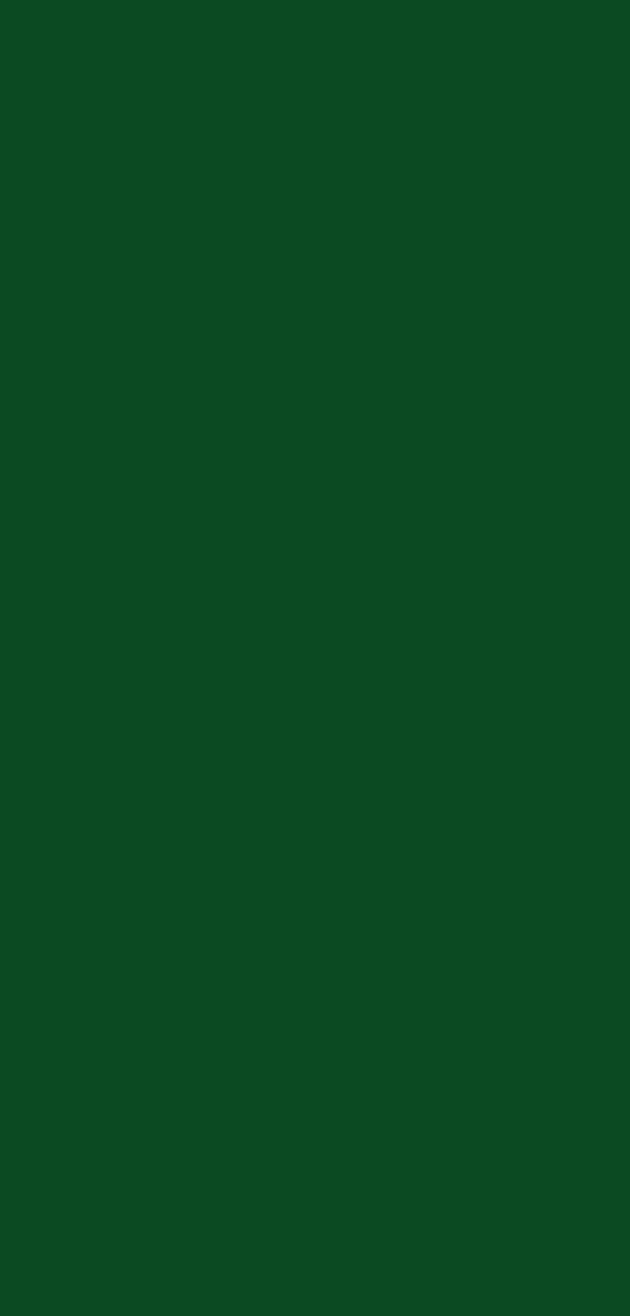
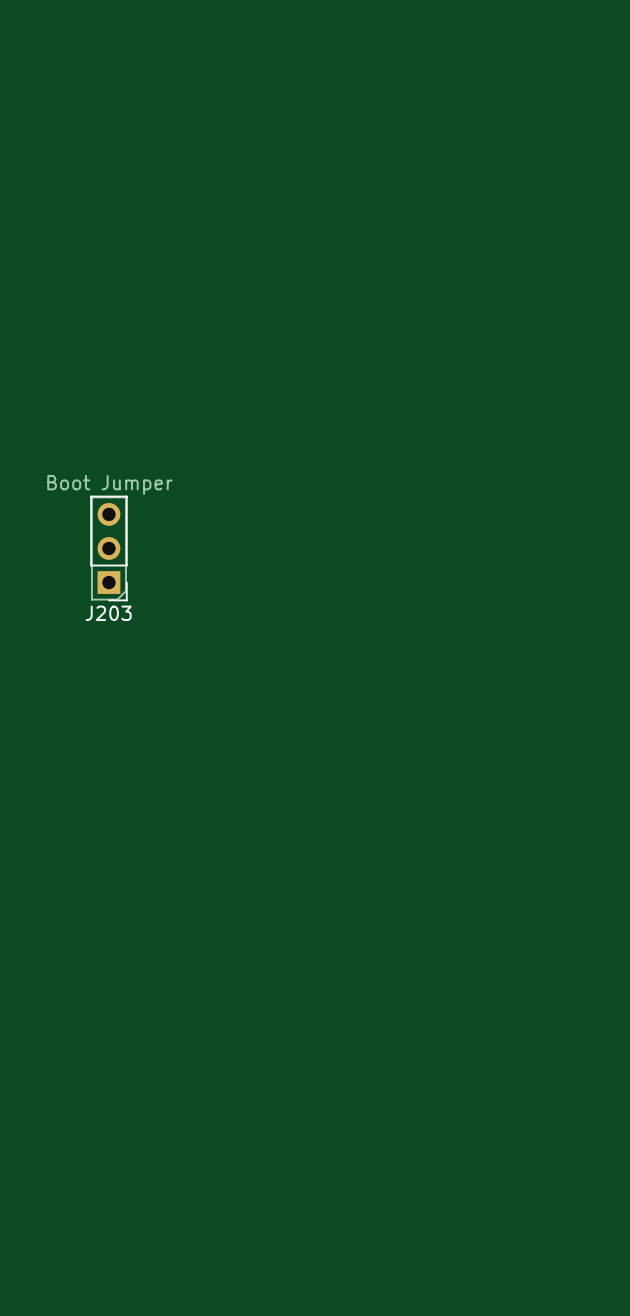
J203: none -> Boot Jumper (108, 548)

